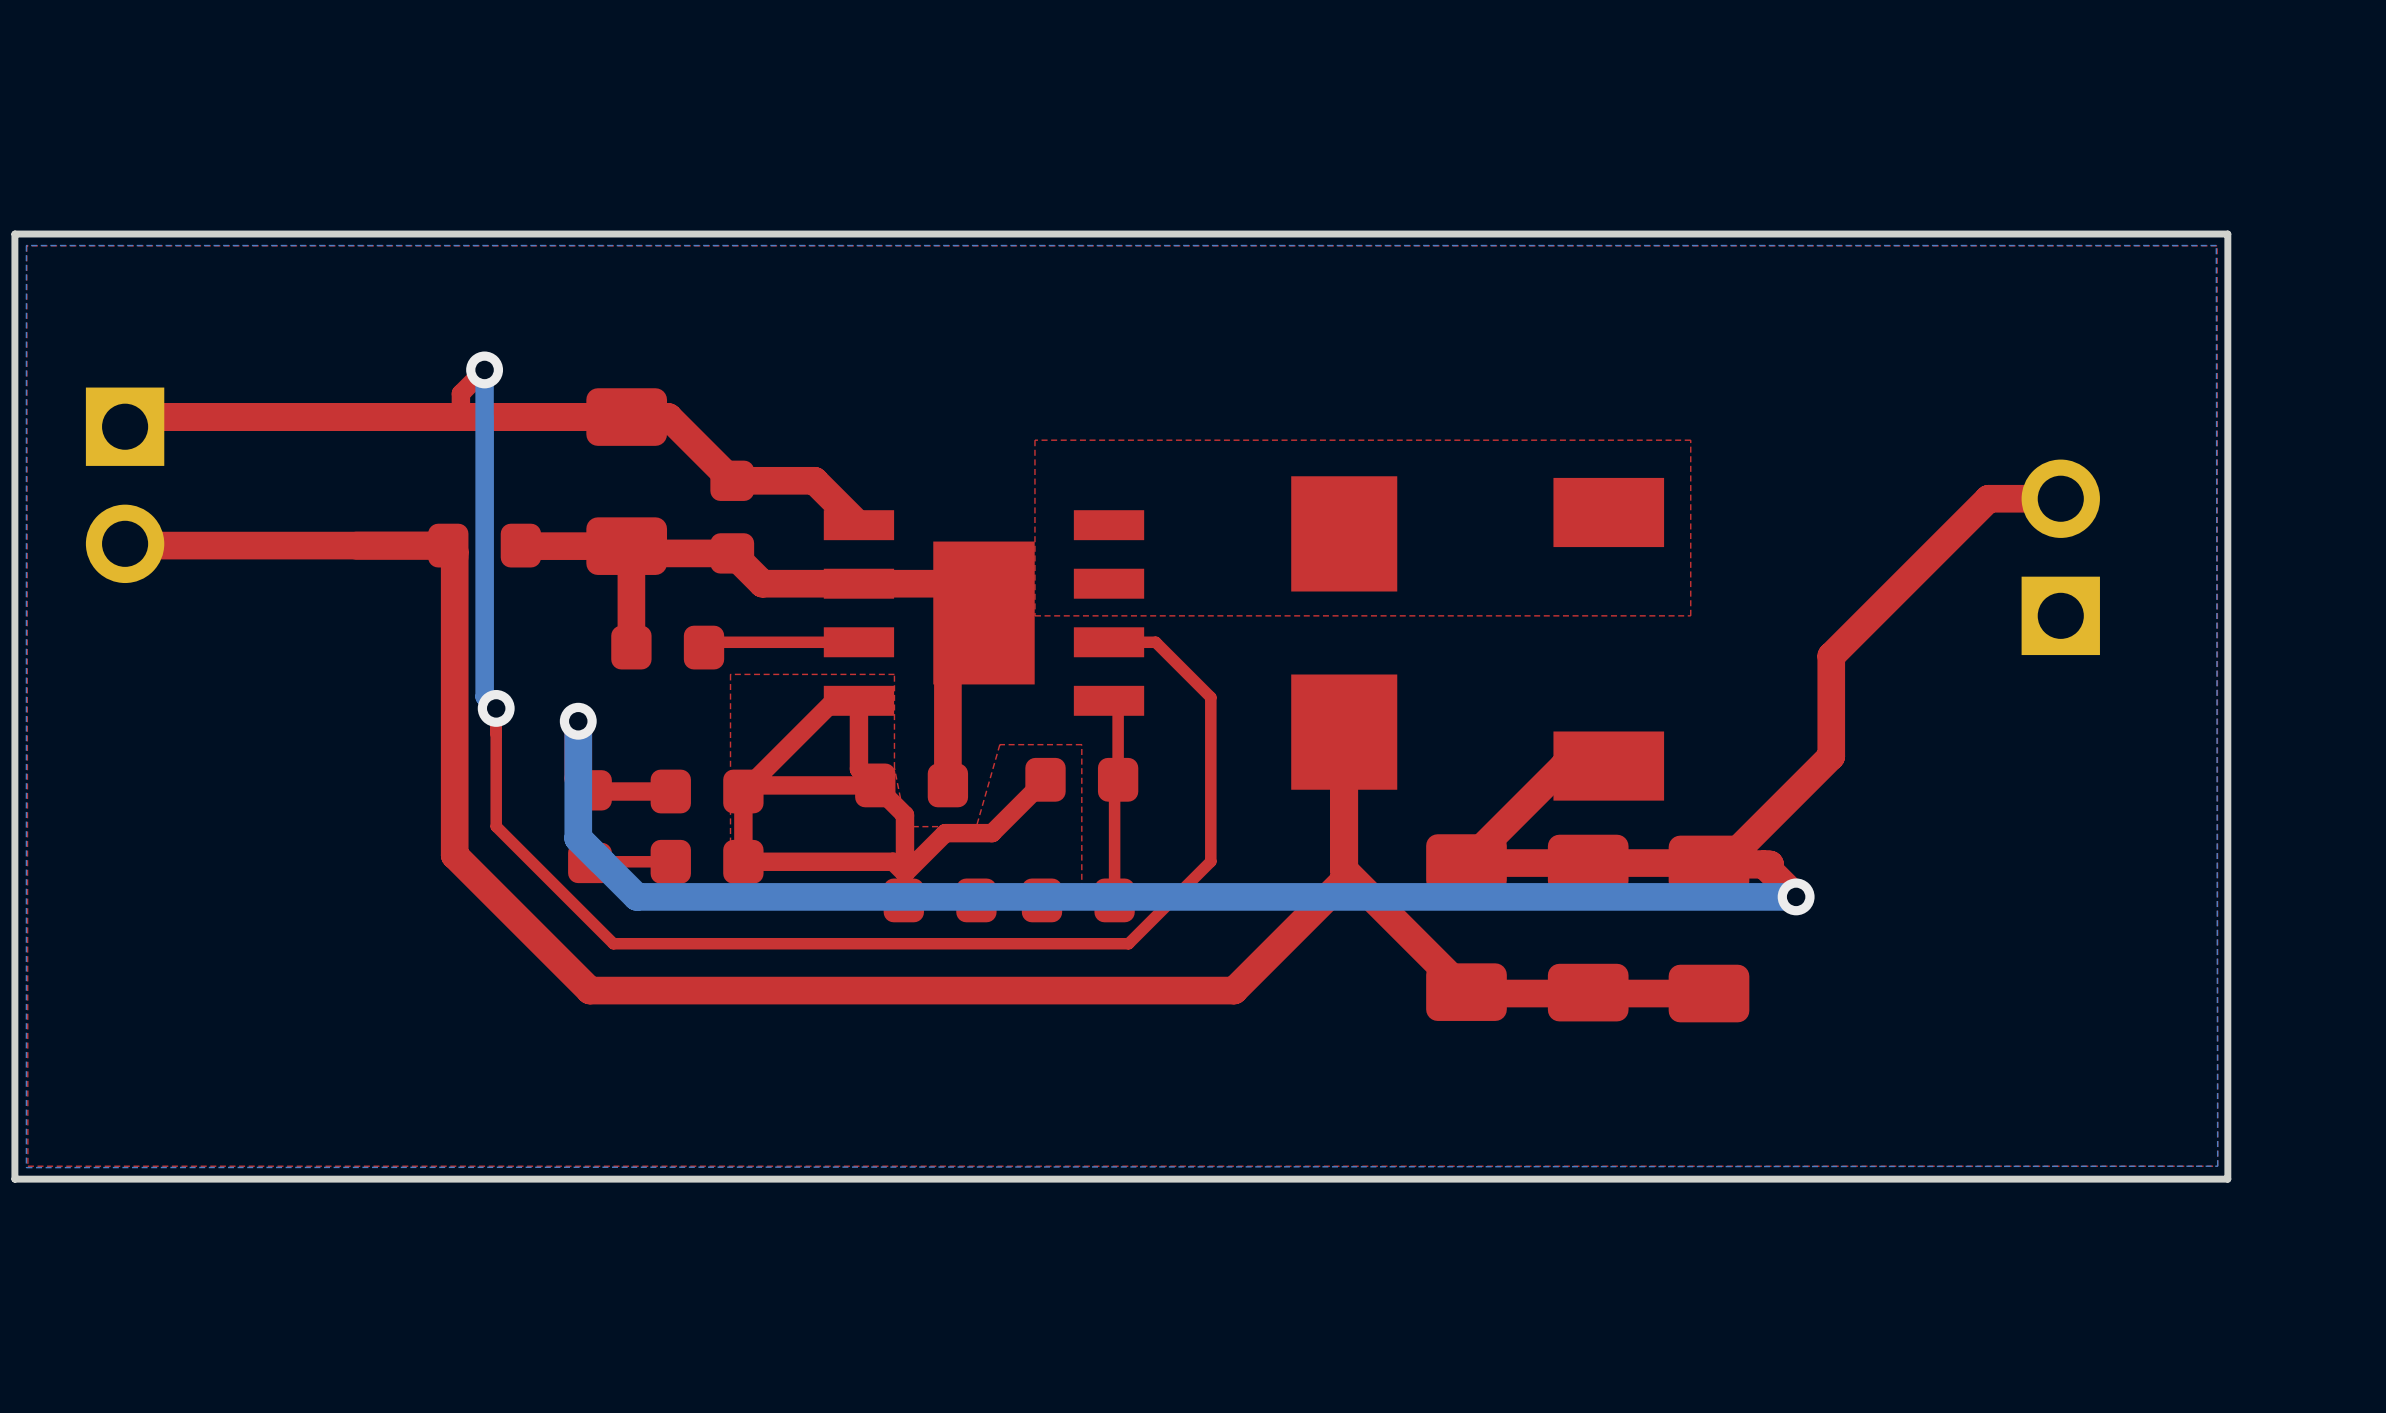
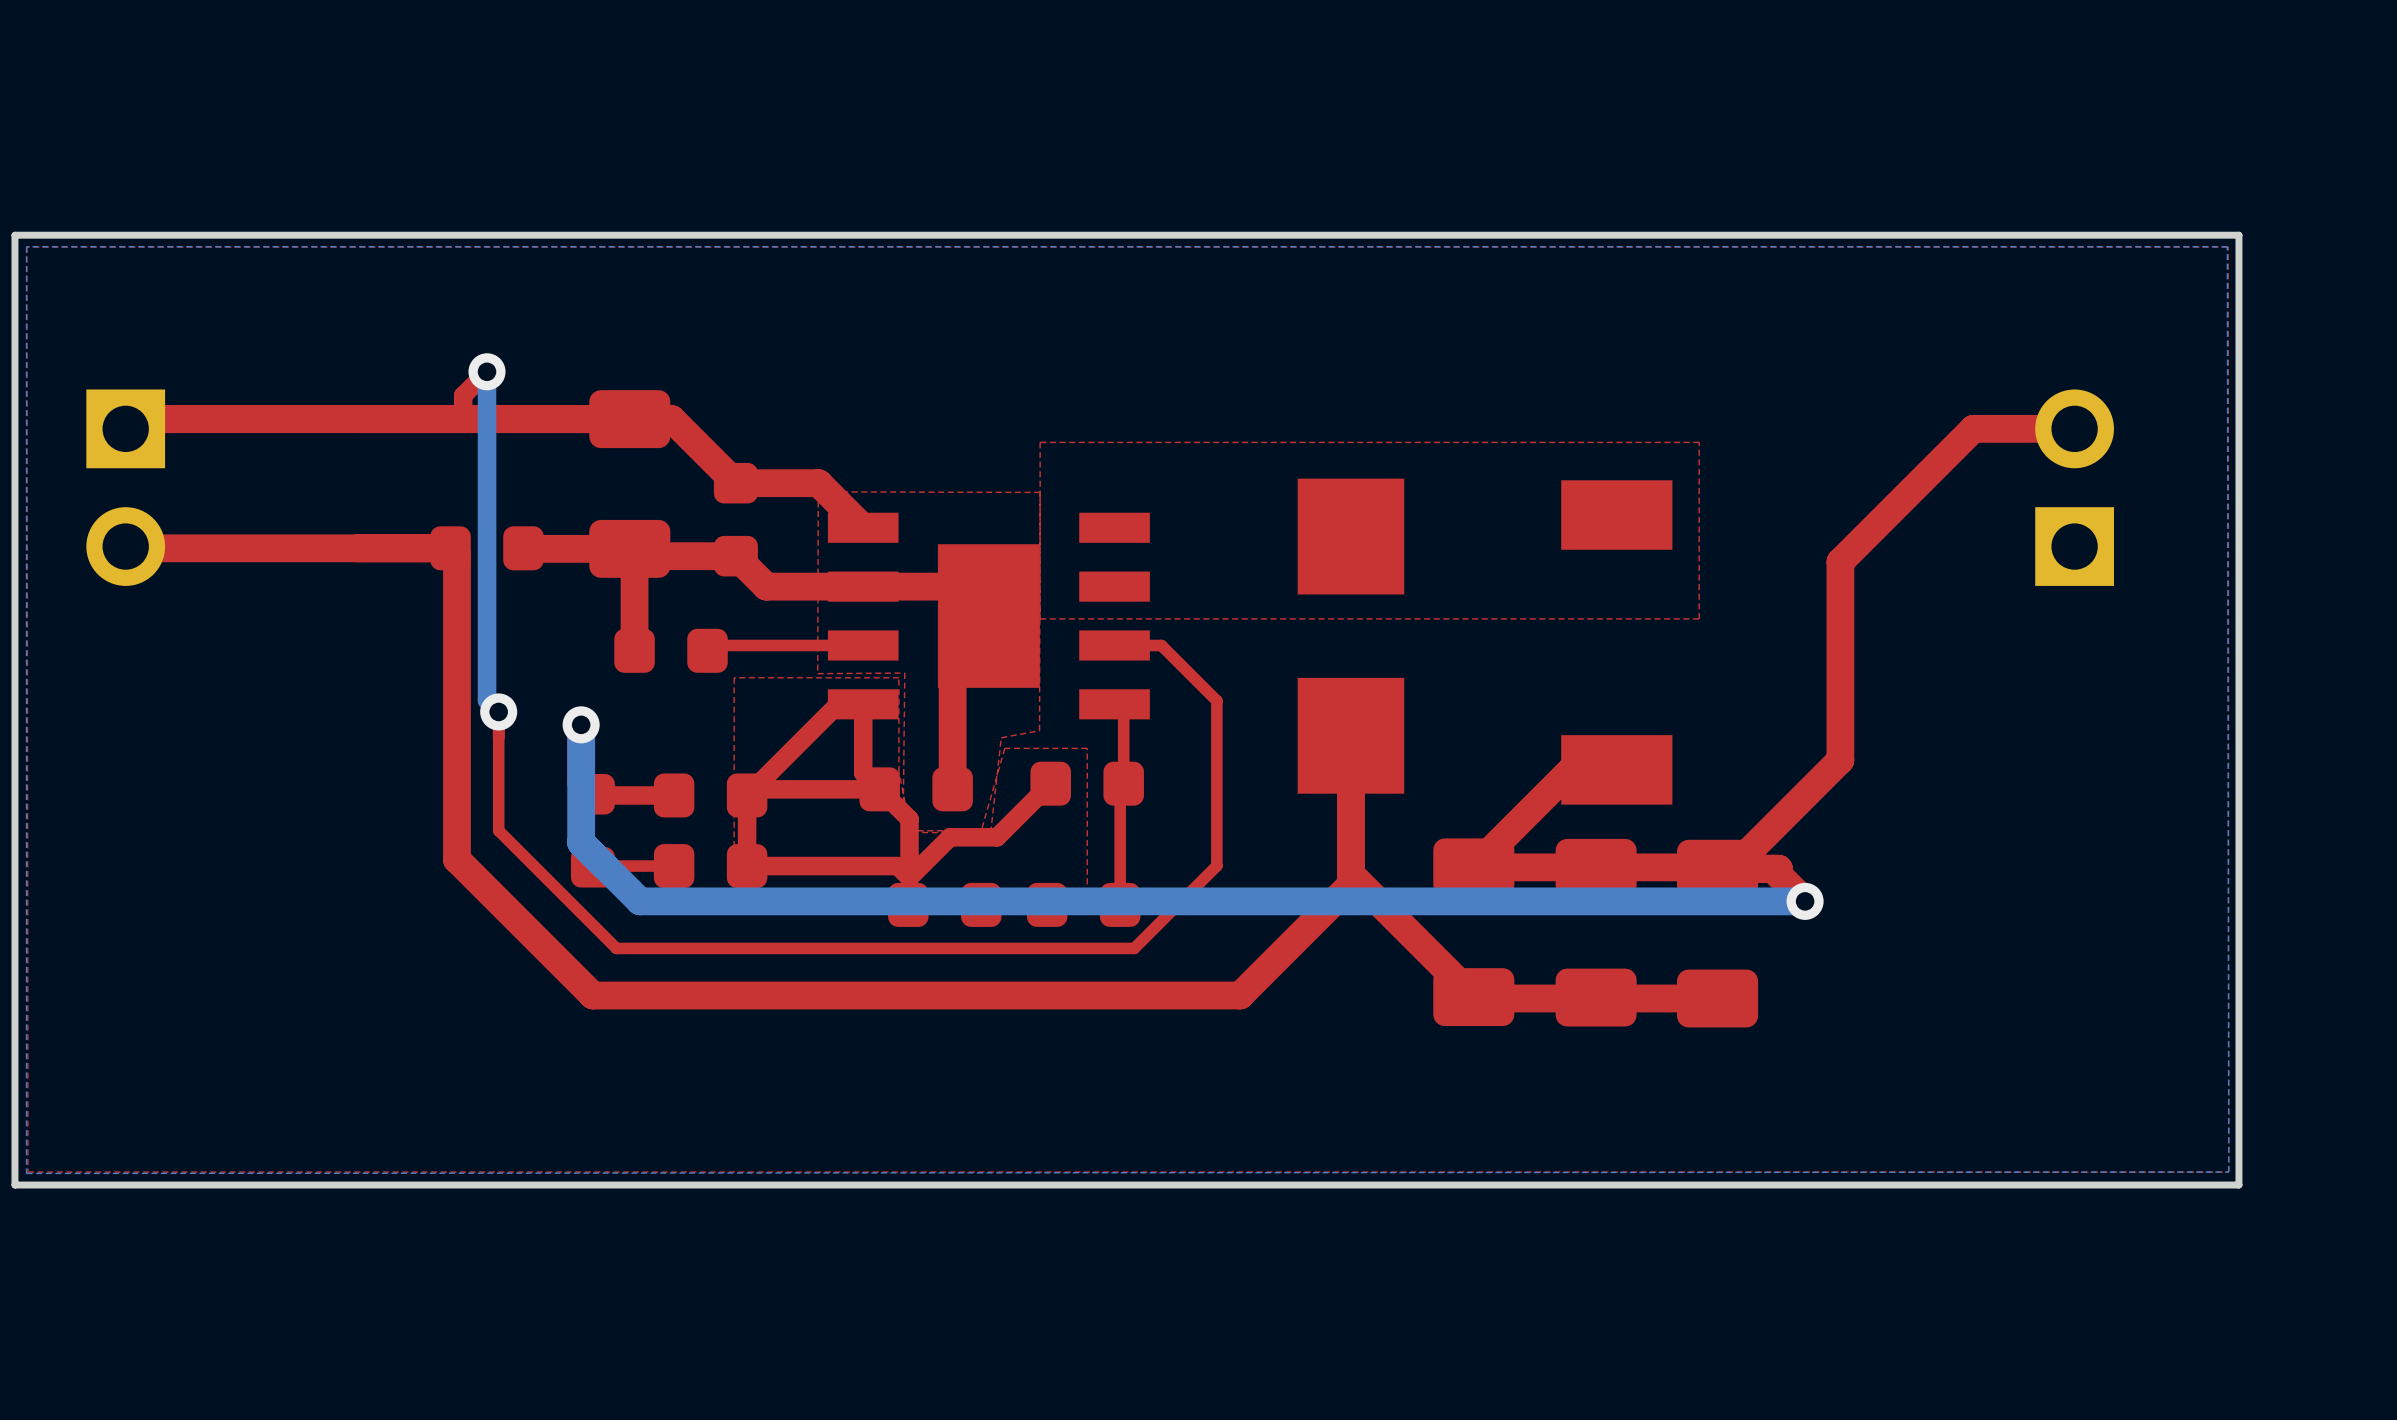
top zone outline: none -> (818, 491) (1040, 492) (1039, 730) (1001, 737) (990, 832) (903, 832) (904, 673) (817, 673) (818, 491)
top track: (2060, 498) (1988, 498) (1831, 656) -> (2074, 428) (1973, 428) (1840, 561) (1840, 659)
part position: (2060, 557) -> (2074, 487)

